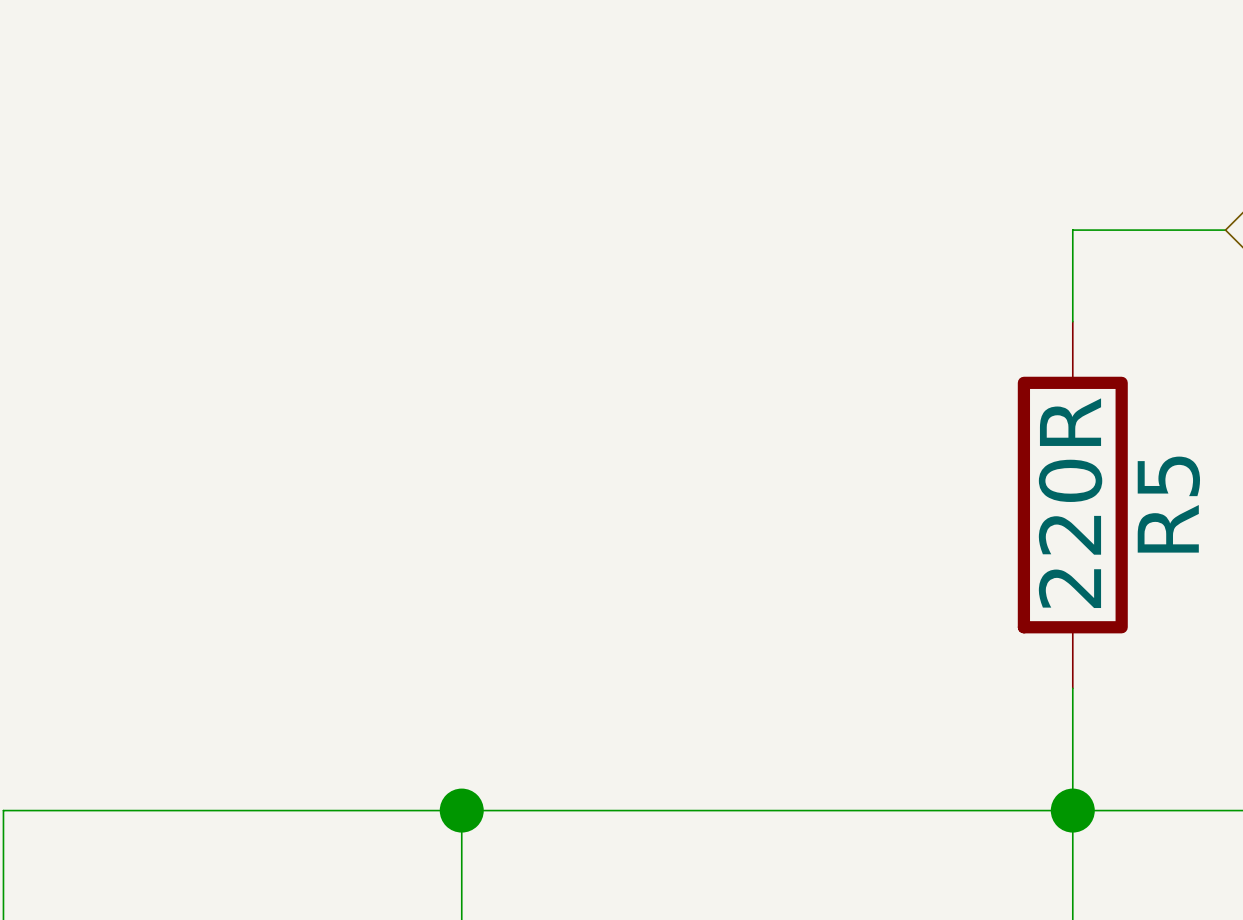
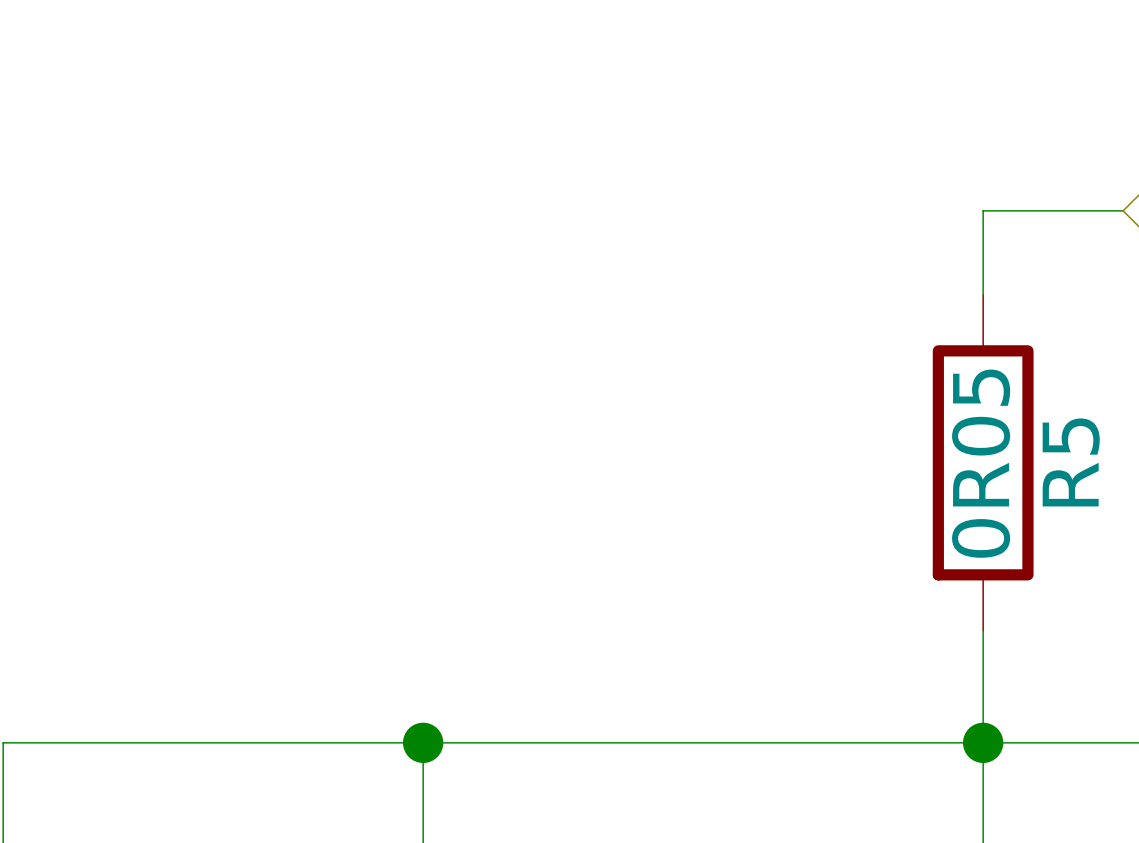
R5 value: 220R (1070, 503) -> 0R05 (981, 463)

